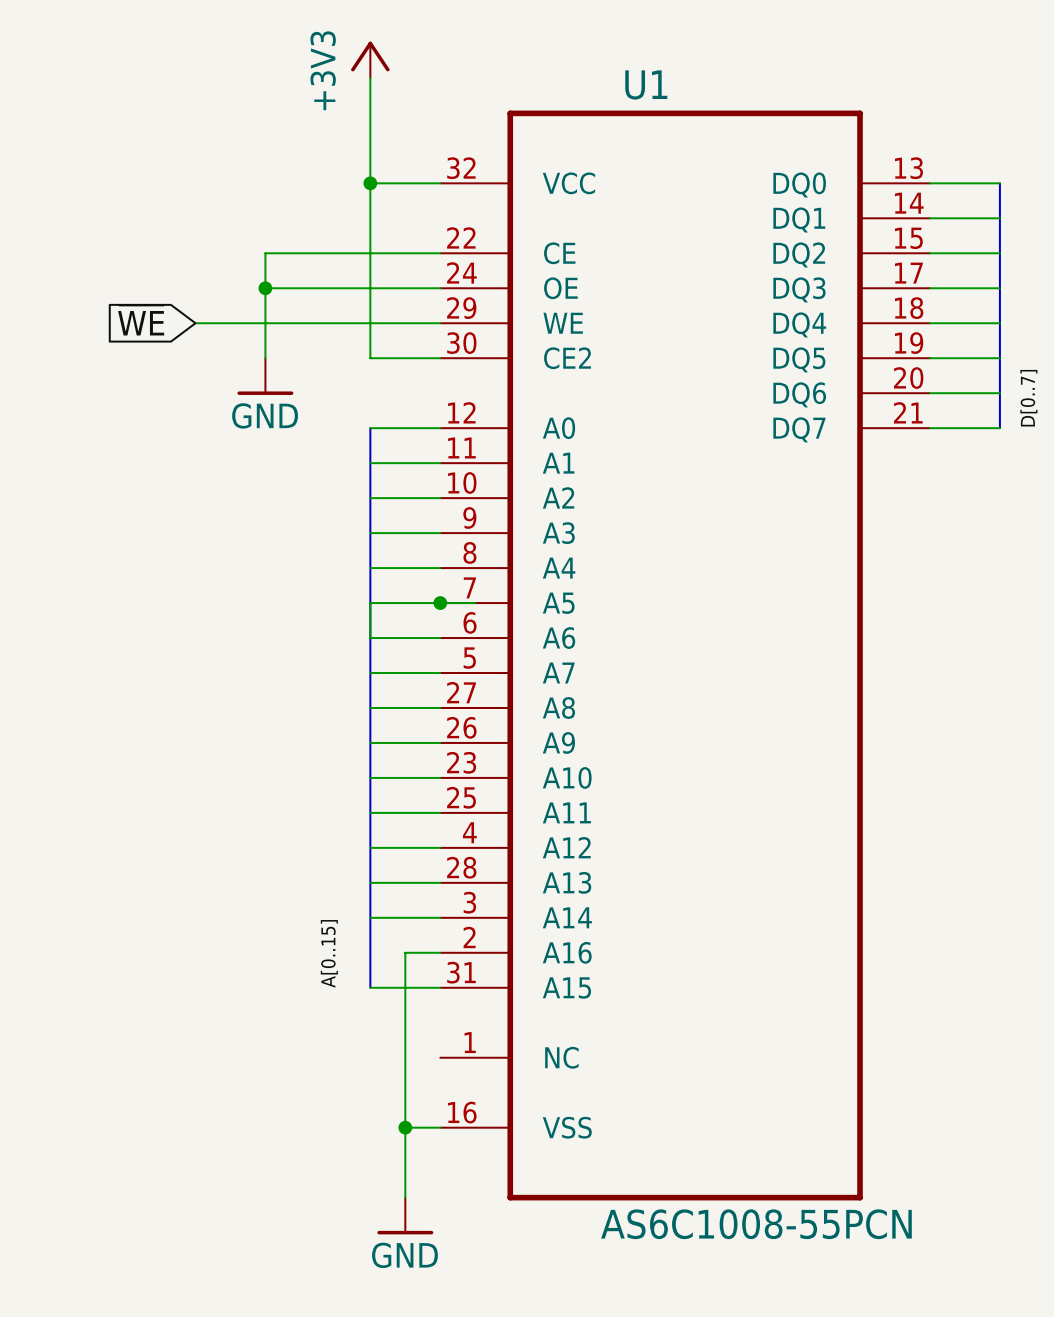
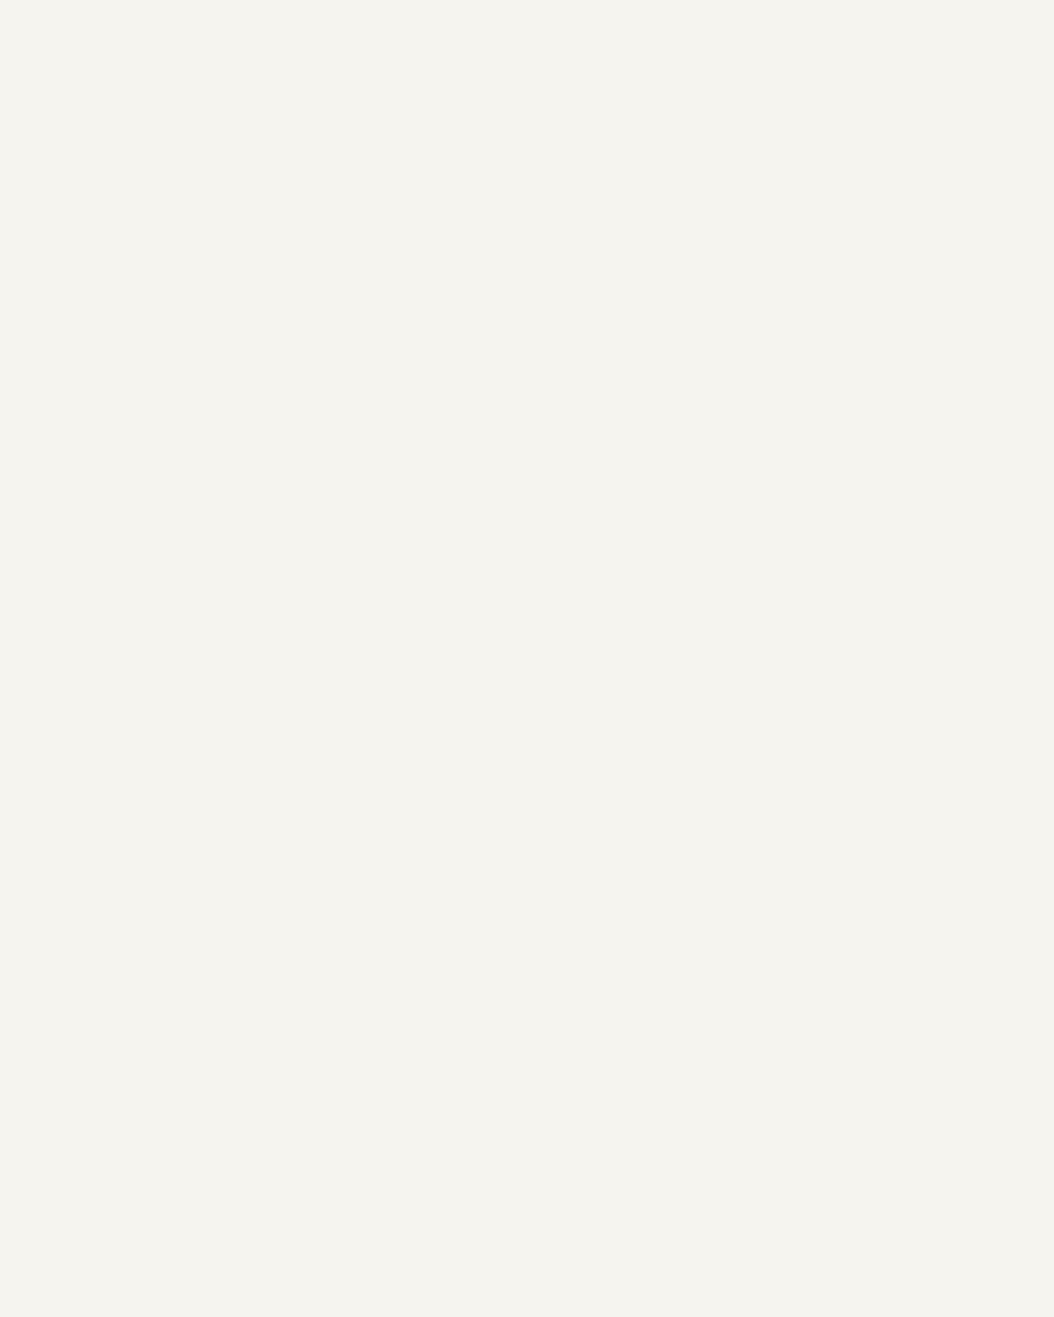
power symbol: +3V3 (370, 60) -> none
wire: (370, 78) (370, 358) (440, 358) -> none
wire: (370, 183) (440, 183) -> none
junction: (370, 183) -> none
wire: (929, 183) (999, 183) -> none
bus: (999, 183) (999, 428) -> none
wire: (929, 218) (999, 218) -> none
wire: (440, 253) (265, 253) (265, 358) -> none
wire: (929, 253) (999, 253) -> none
wire: (265, 288) (440, 288) -> none
junction: (265, 288) -> none
wire: (929, 288) (999, 288) -> none
global label: ~{WE} (141, 320) -> none
wire: (195, 323) (440, 323) -> none
wire: (929, 323) (999, 323) -> none
wire: (929, 358) (999, 358) -> none
power symbol: GND (265, 376) -> none
wire: (929, 393) (999, 393) -> none
label: D[0..7] (1028, 398) -> none
bus: (370, 428) (370, 987) -> none
wire: (370, 428) (440, 428) -> none
wire: (929, 428) (999, 428) -> none
wire: (370, 463) (440, 463) -> none
wire: (370, 498) (440, 498) -> none
wire: (370, 533) (440, 533) -> none
wire: (370, 568) (440, 568) -> none
junction: (440, 603) -> none
wire: (475, 603) (370, 603) (370, 638) (440, 638) -> none
U1: AS6C1008-55PCN (685, 655) -> none
wire: (370, 673) (440, 673) -> none
wire: (370, 707) (440, 707) -> none
wire: (370, 742) (440, 742) -> none
wire: (370, 777) (440, 777) -> none
wire: (370, 812) (440, 812) -> none
wire: (370, 847) (440, 847) -> none
wire: (370, 882) (440, 882) -> none
wire: (370, 917) (440, 917) -> none
wire: (440, 952) (405, 952) (405, 1197) -> none
label: A[0..15] (329, 953) -> none
wire: (370, 987) (440, 987) -> none
wire: (405, 1127) (440, 1127) -> none
junction: (405, 1127) -> none
power symbol: GND (405, 1216) -> none

